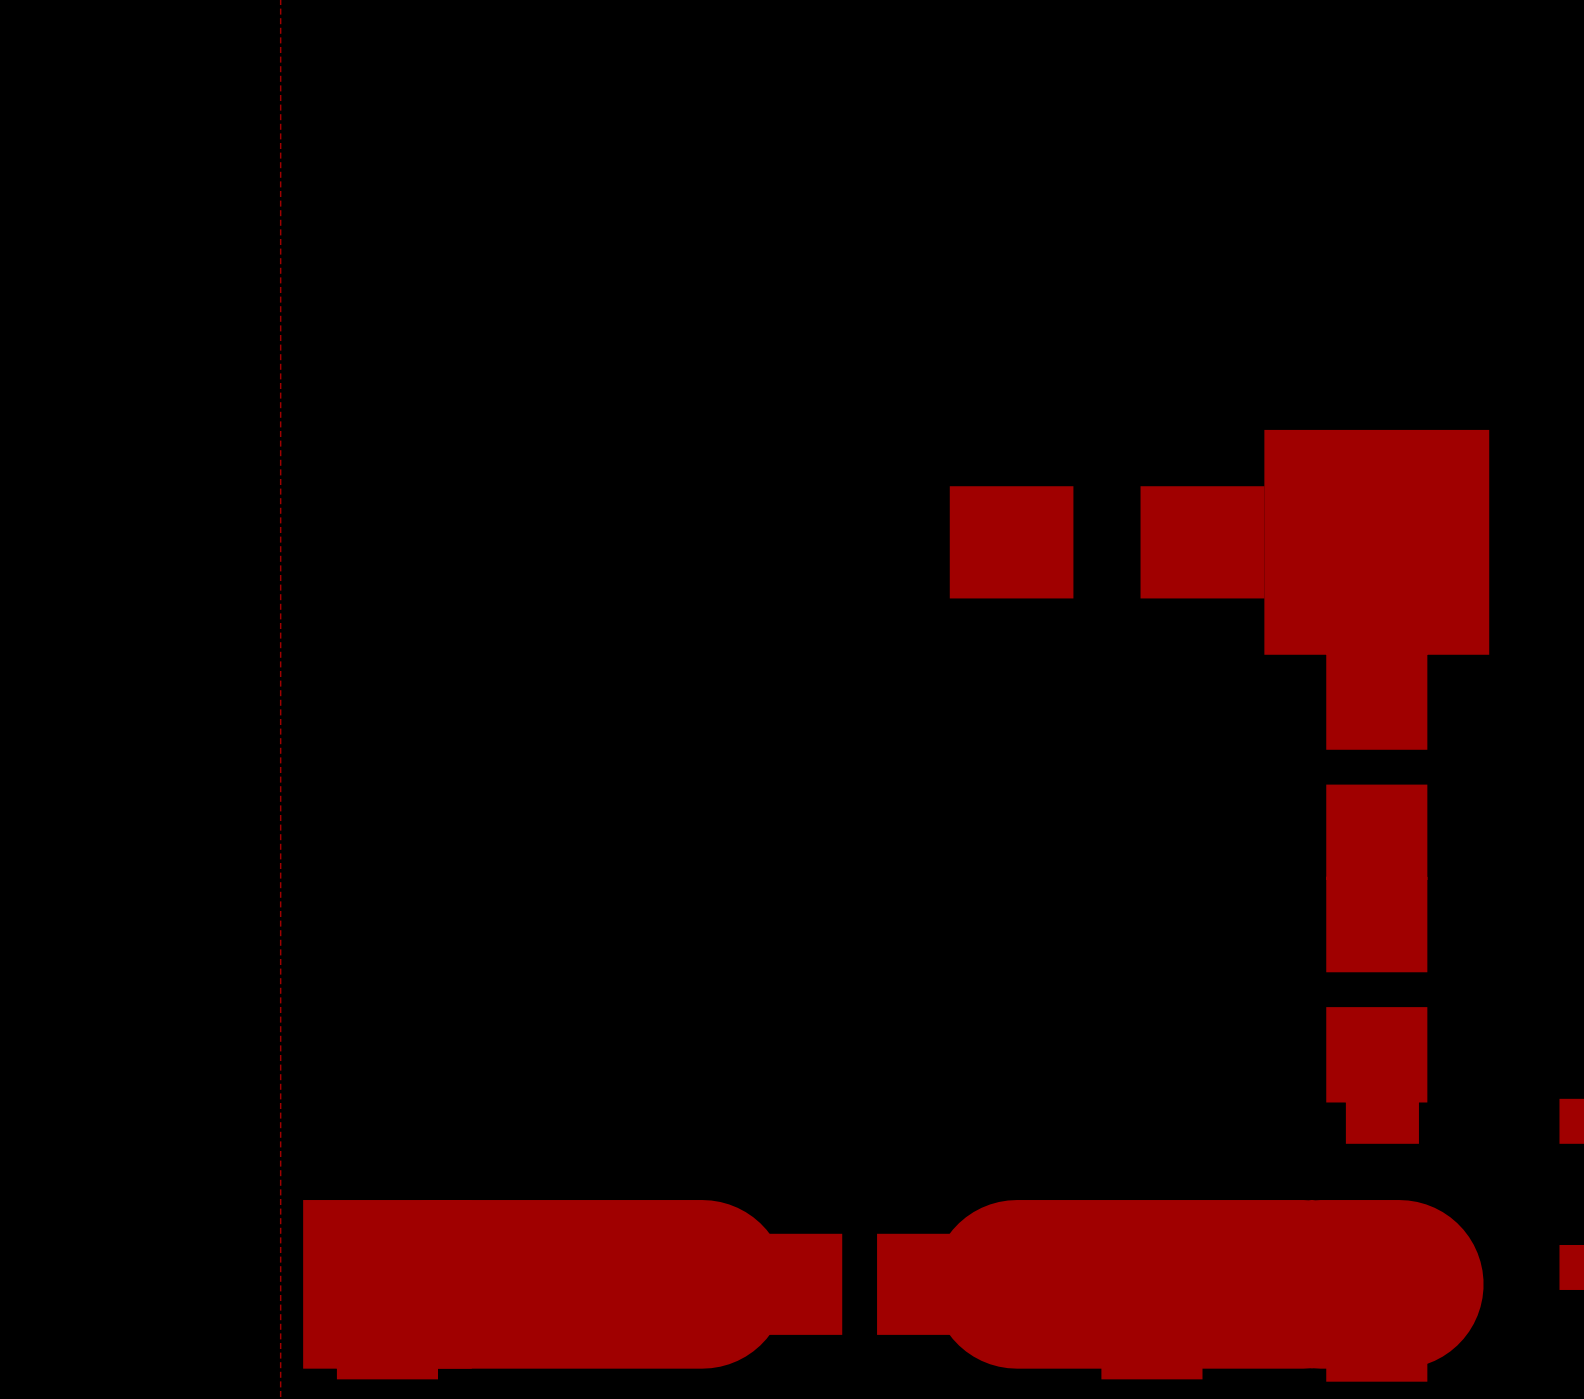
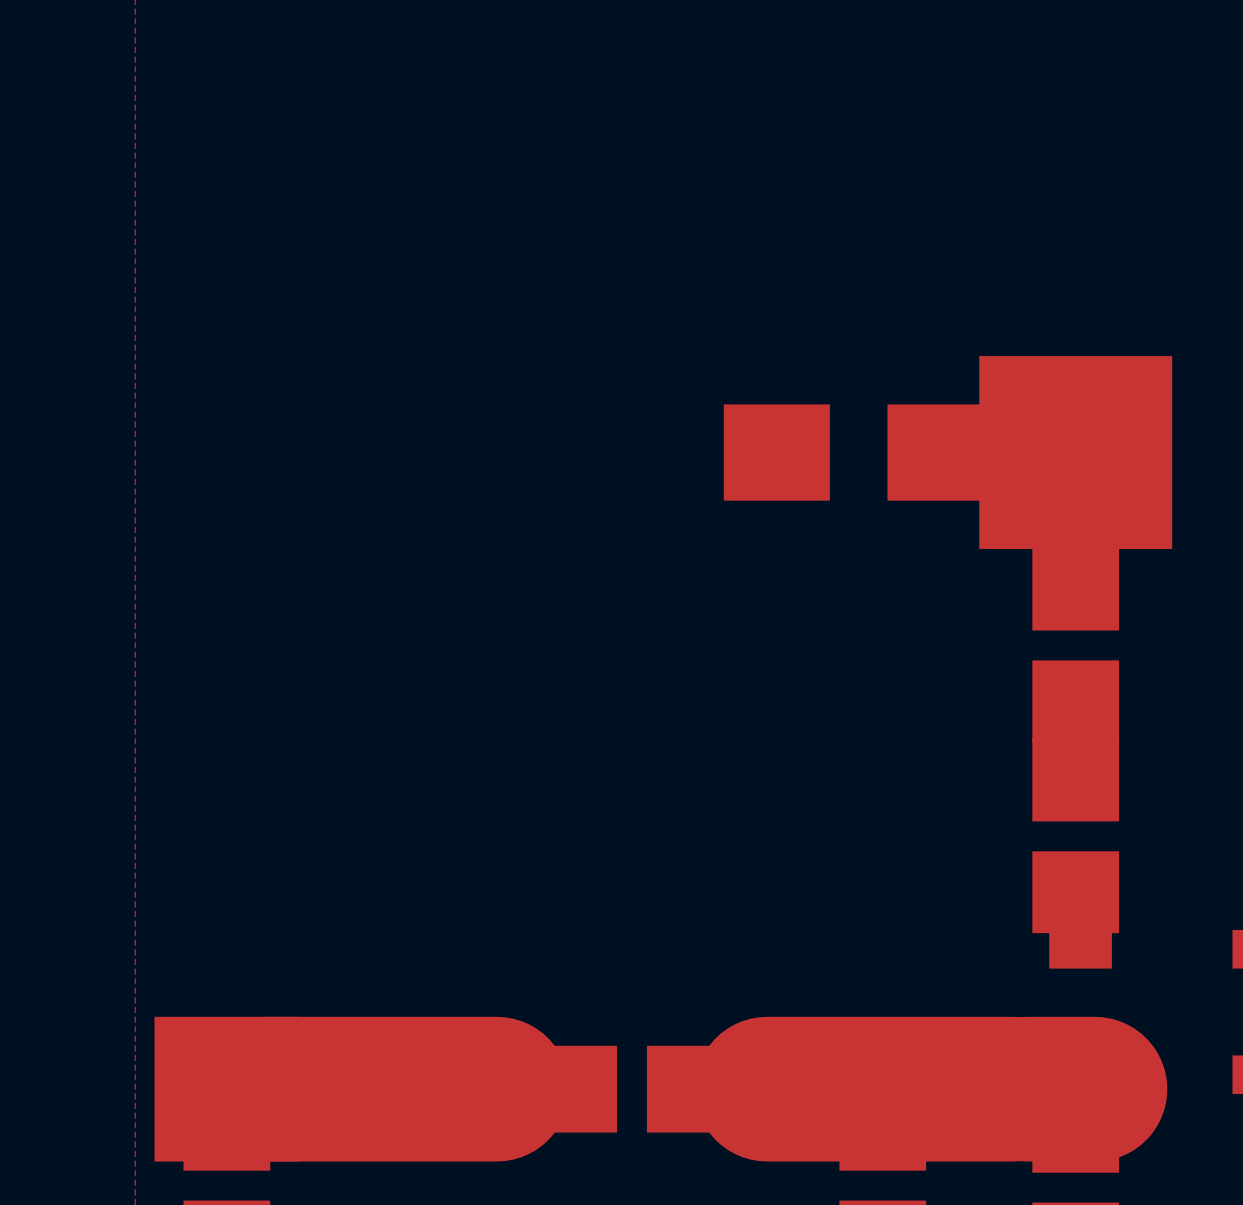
part position: (1106, 542) -> (858, 452)

